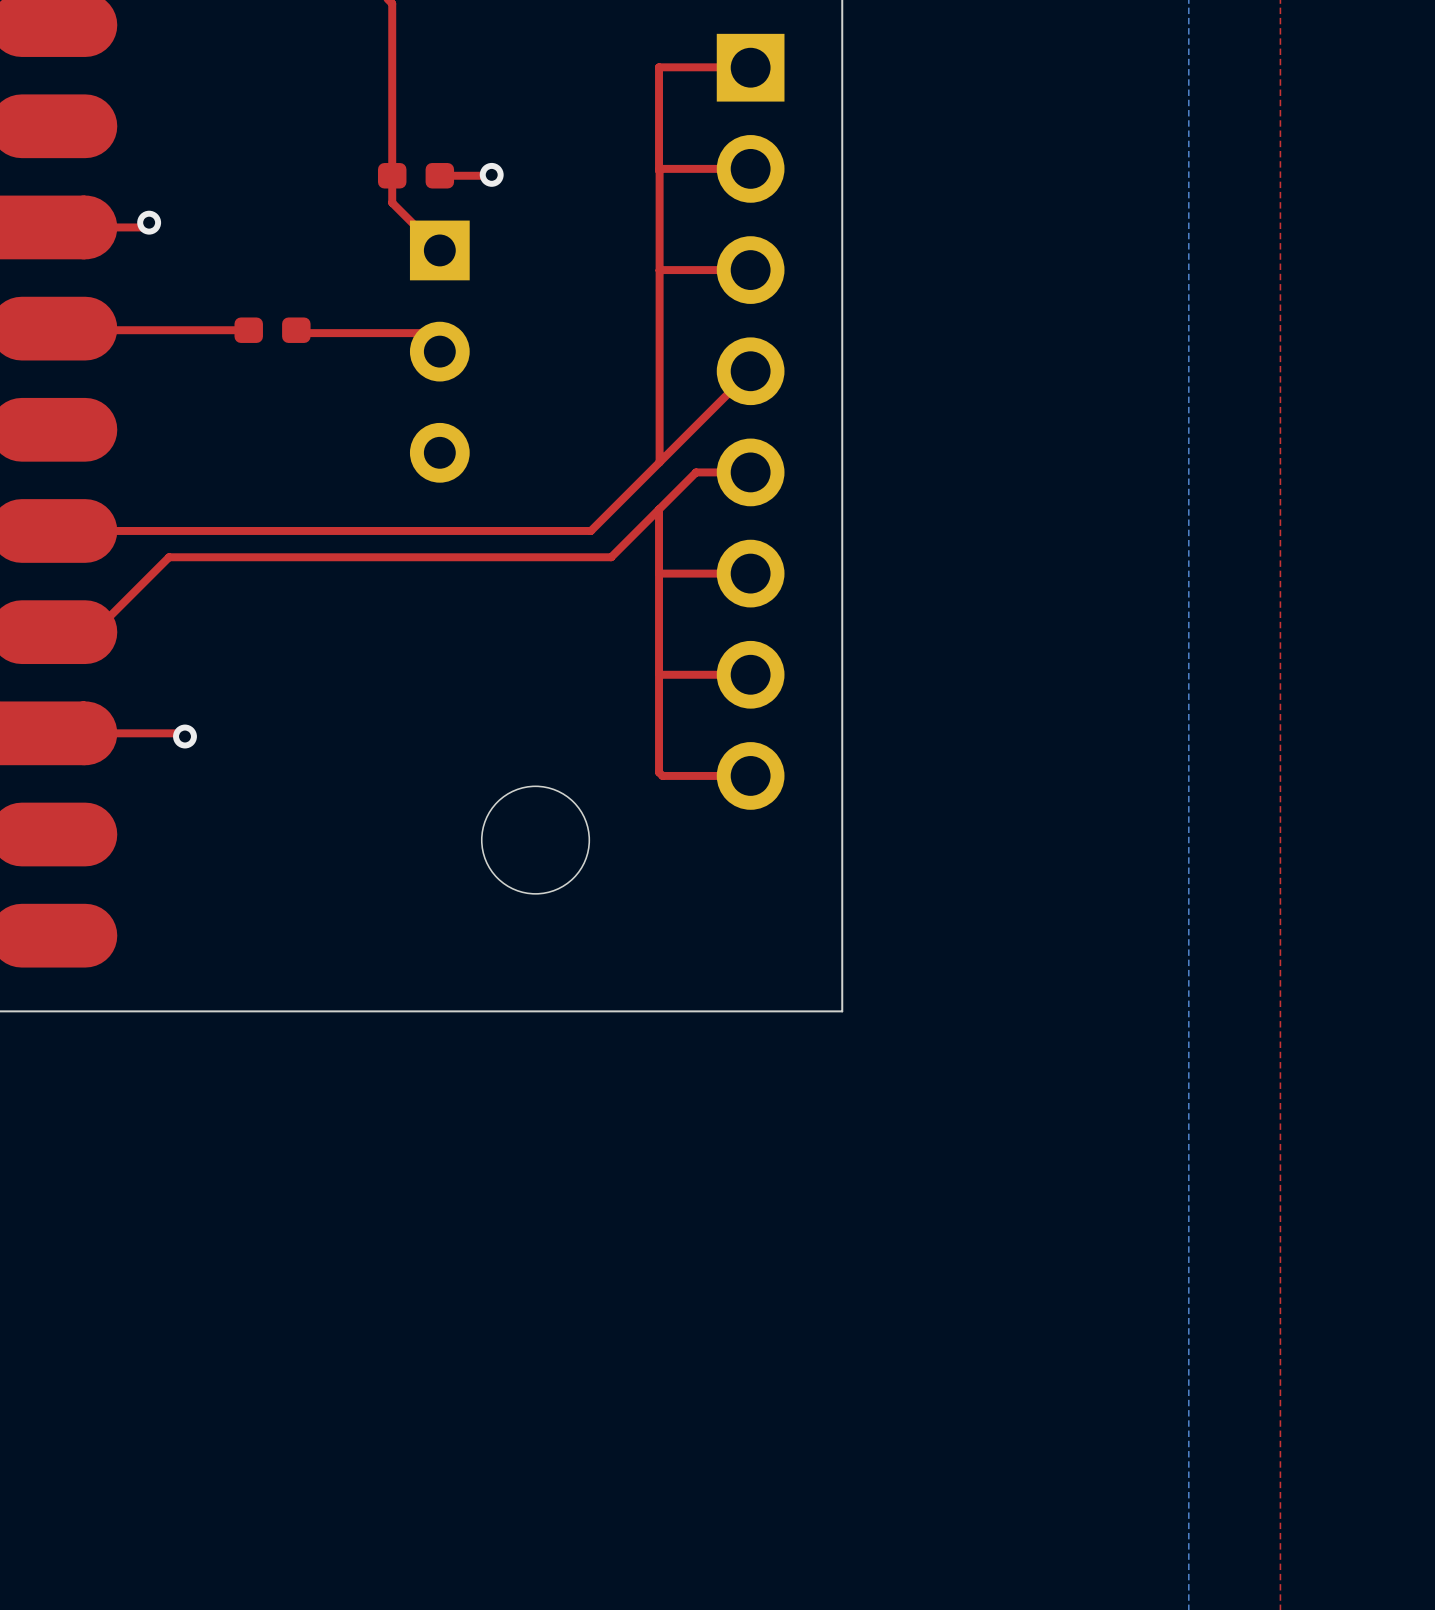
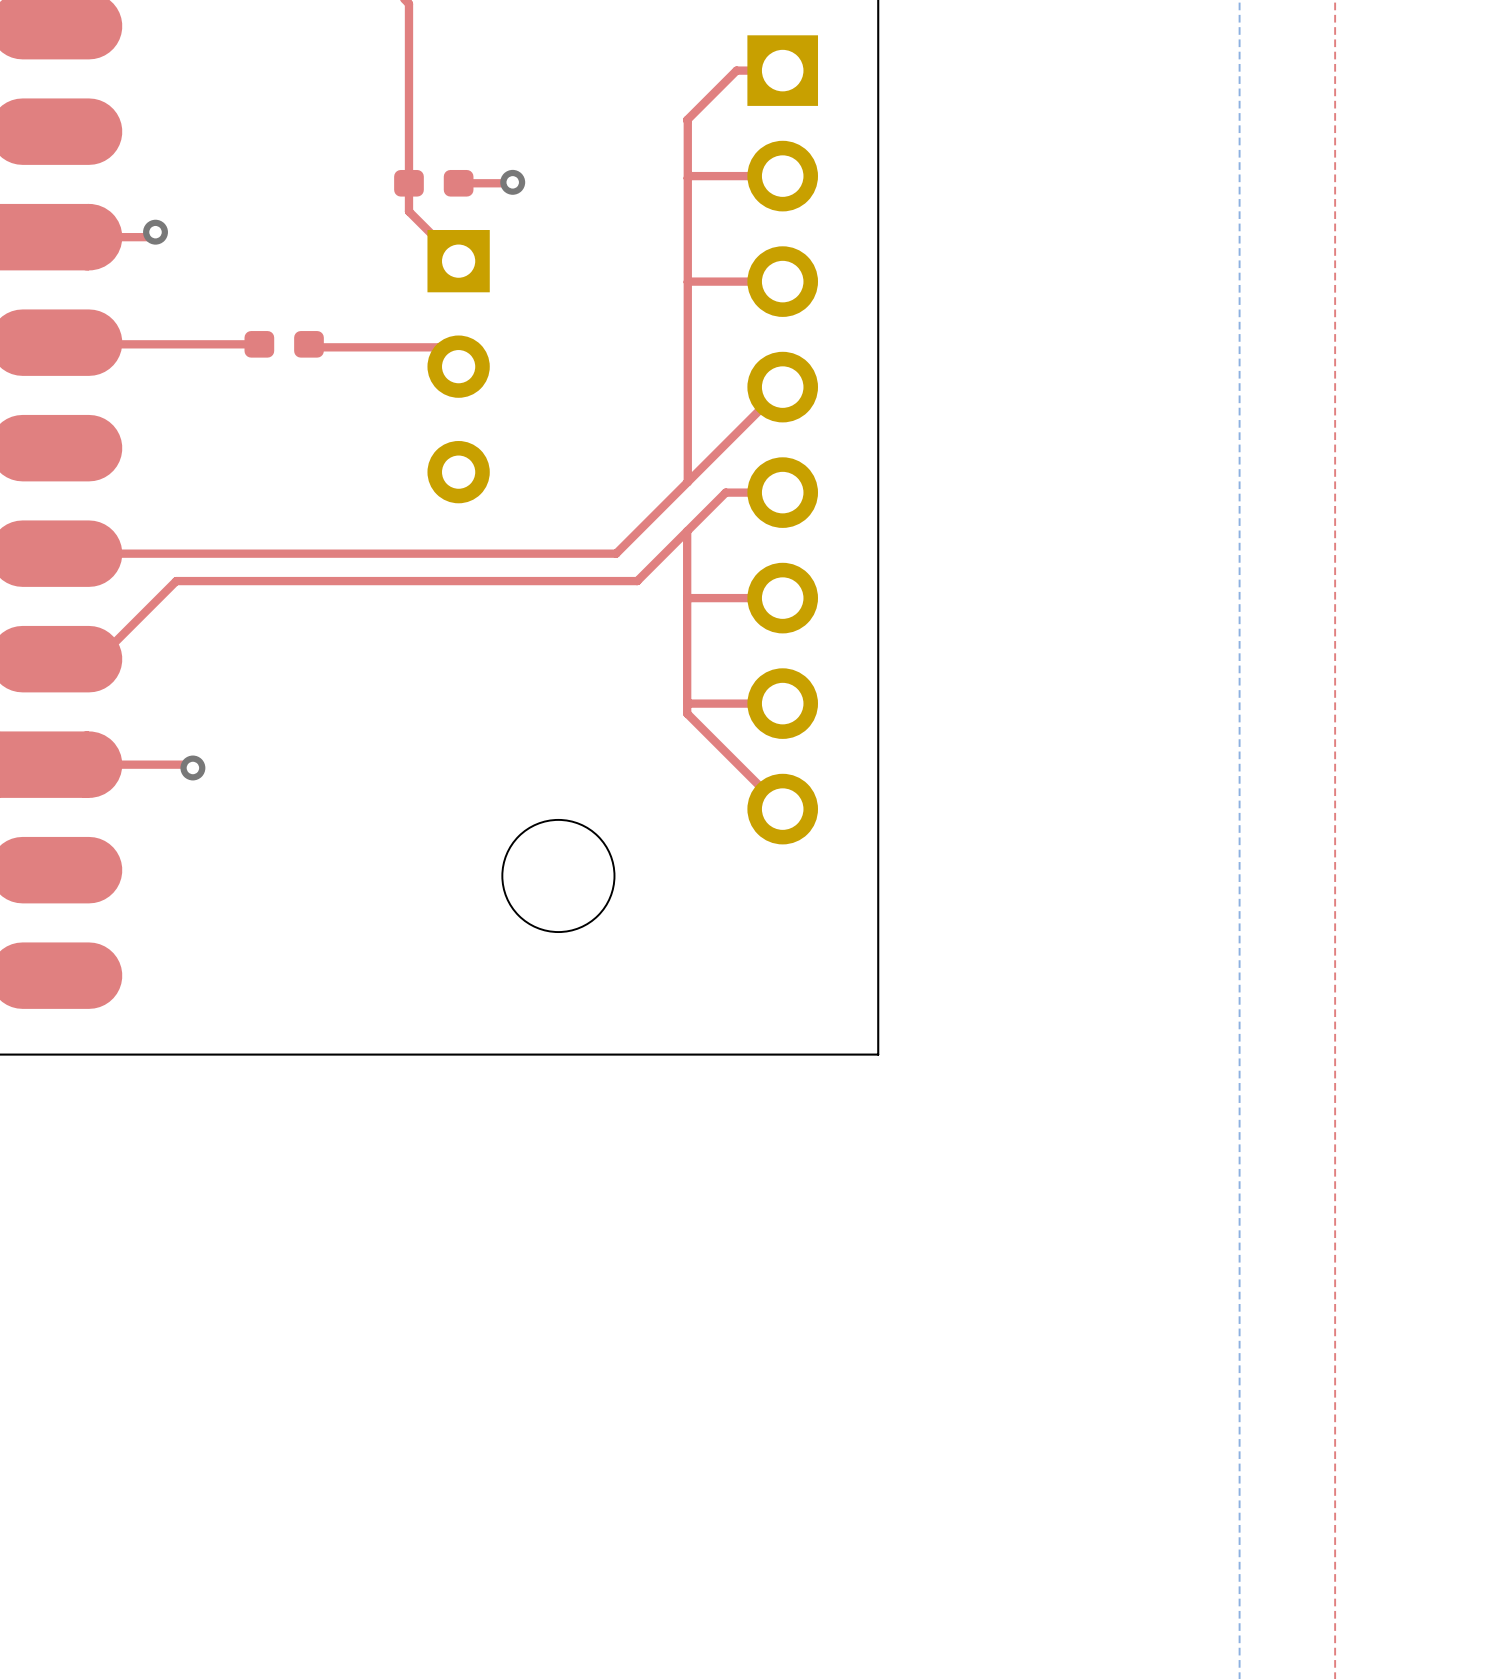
top track: (750, 67) (659, 67) (659, 170) -> (782, 70) (736, 70) (687, 120) (687, 178)
top track: (659, 684) (659, 772) (662, 775) (750, 775) -> (687, 713) (782, 809)

